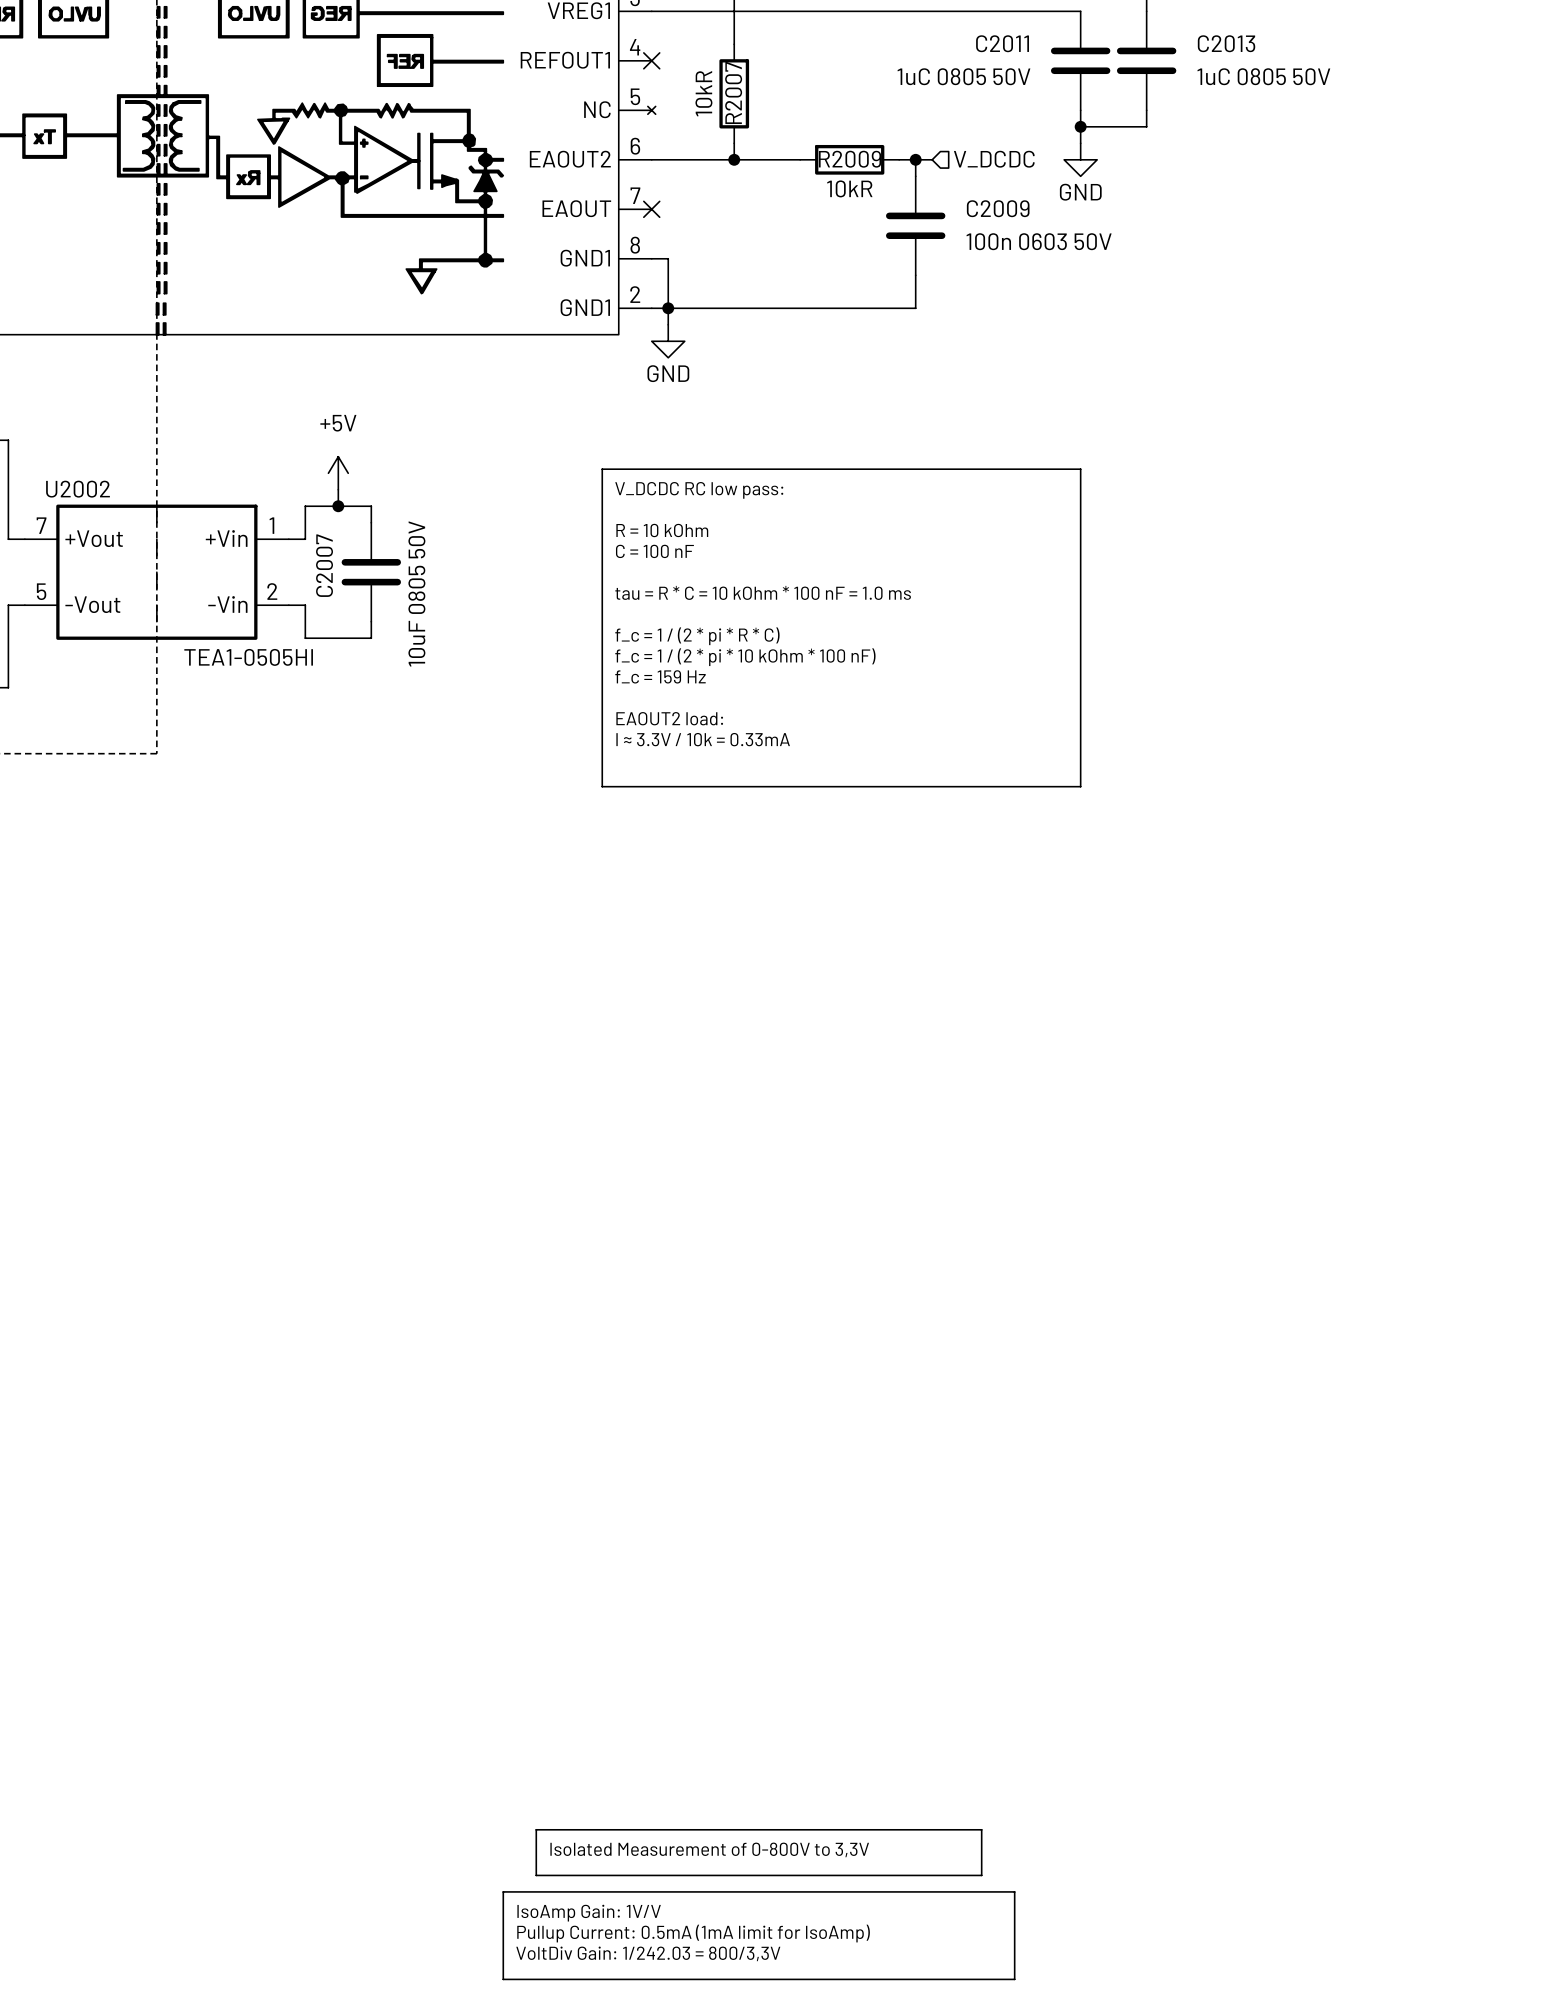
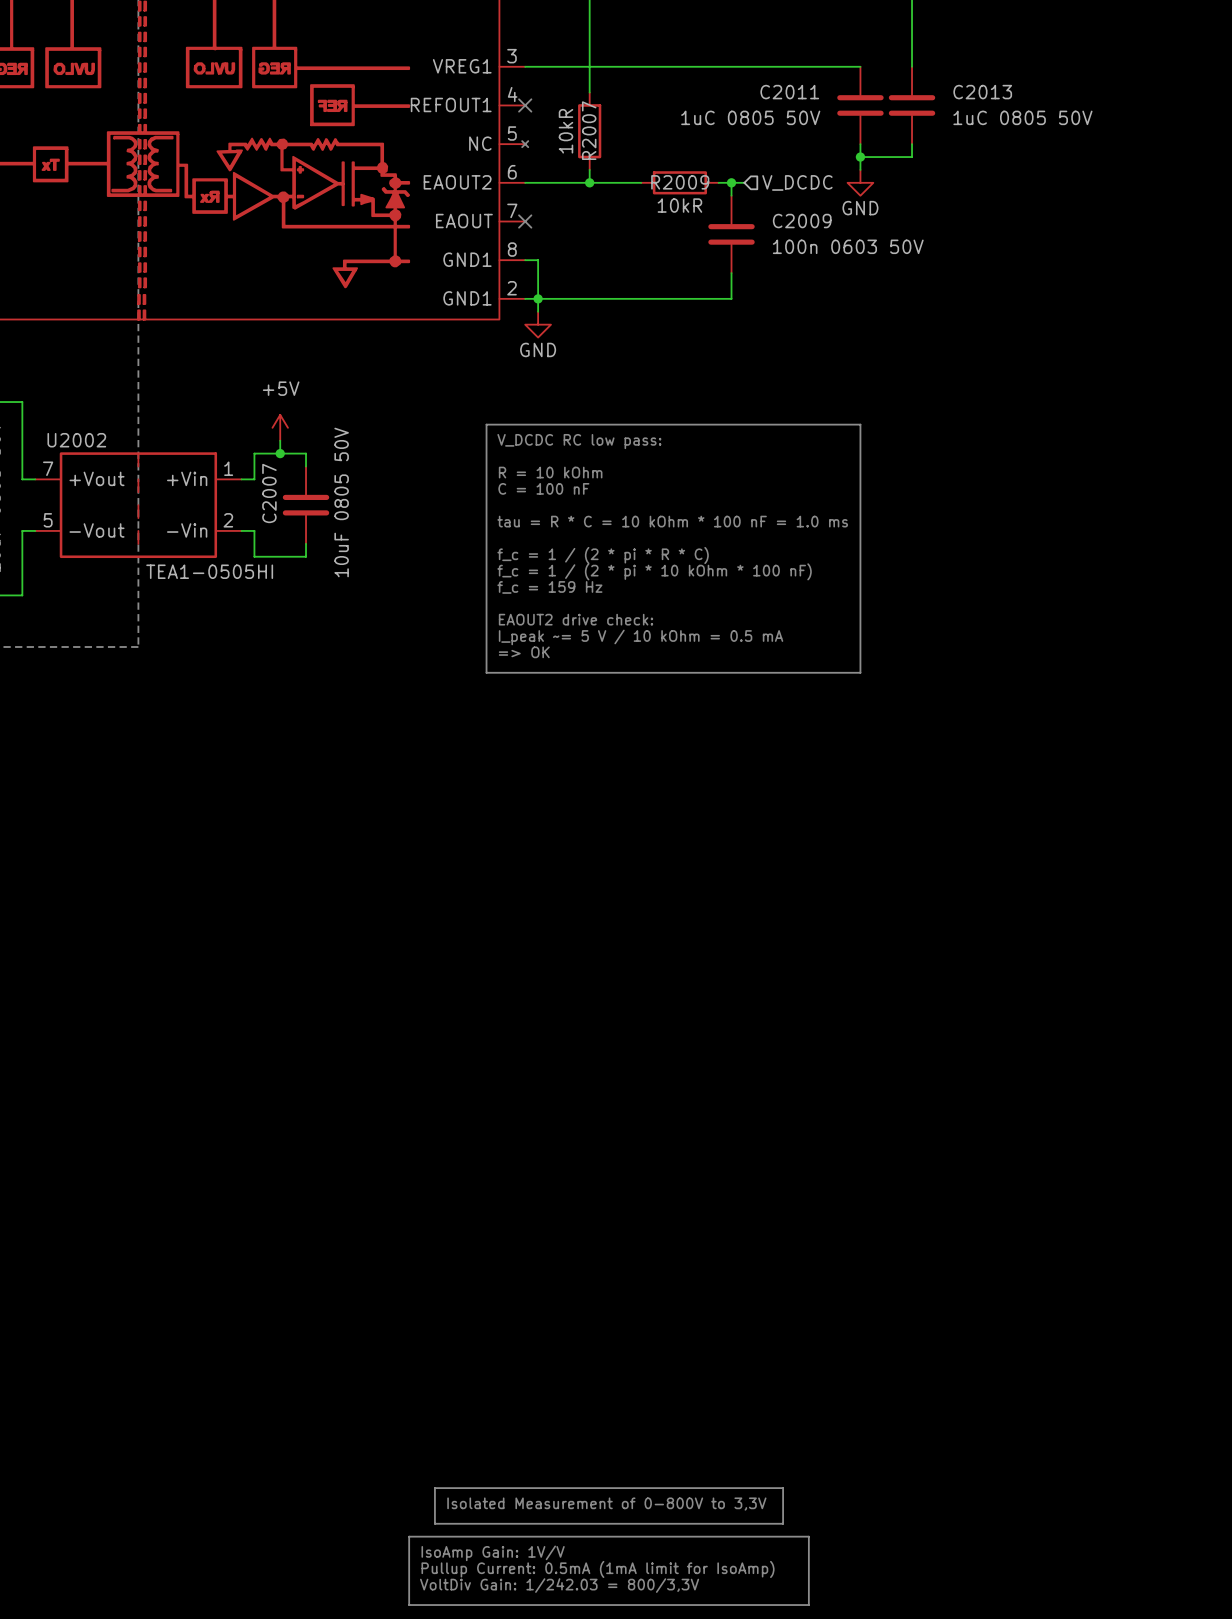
text: EAOUT2 load: (669, 718) -> EAOUT2 drive check: (576, 619)
text: I ≈ 3.3V / 10k = 0.33mA (703, 739) -> I_peak ~= 5 V / 10 kOhm = 0.5 mA (641, 637)
text: none -> => OK (524, 652)

